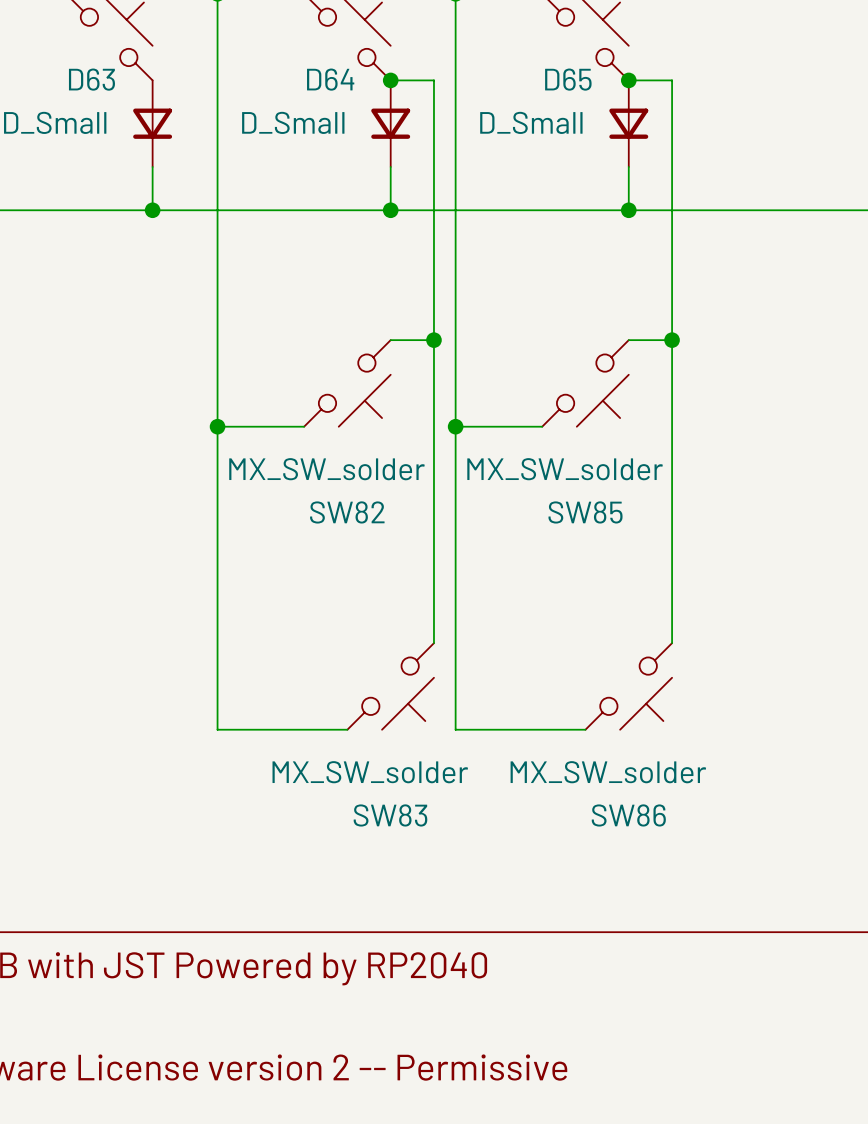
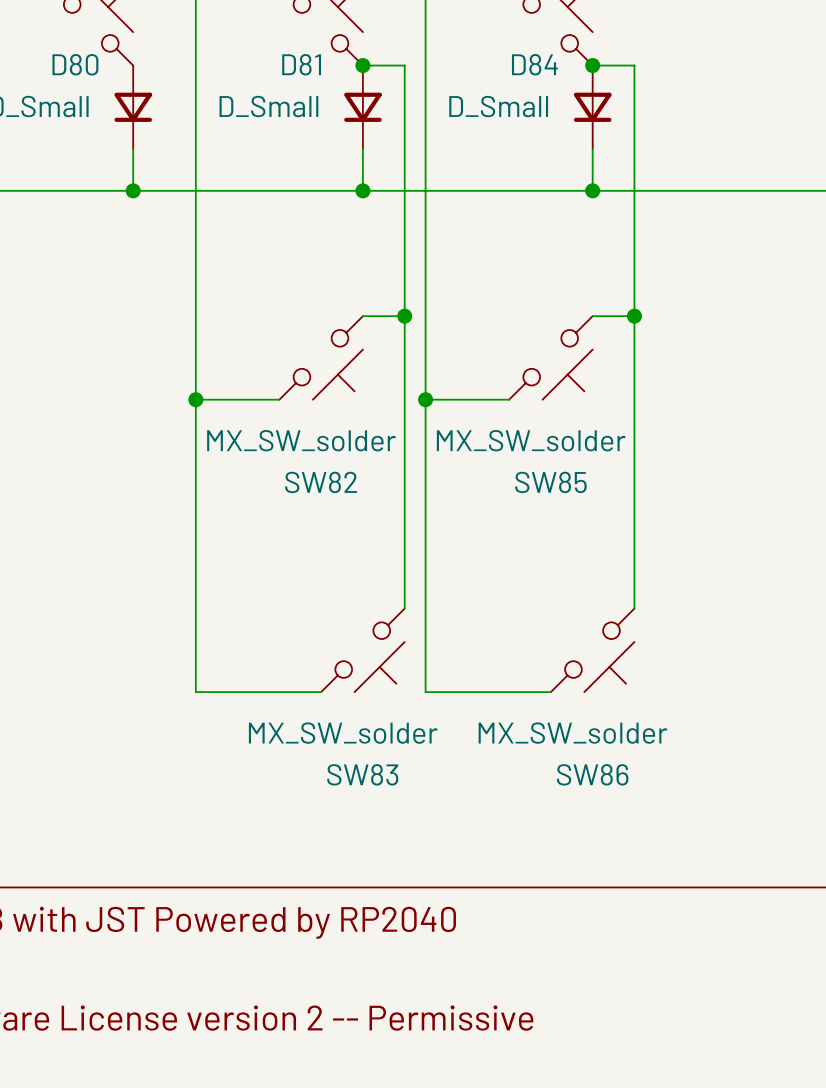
D63 name: D63 (91, 79) -> D80 (75, 64)
D64 name: D64 (330, 79) -> D81 (301, 64)
D65 name: D65 (568, 79) -> D84 (534, 64)

